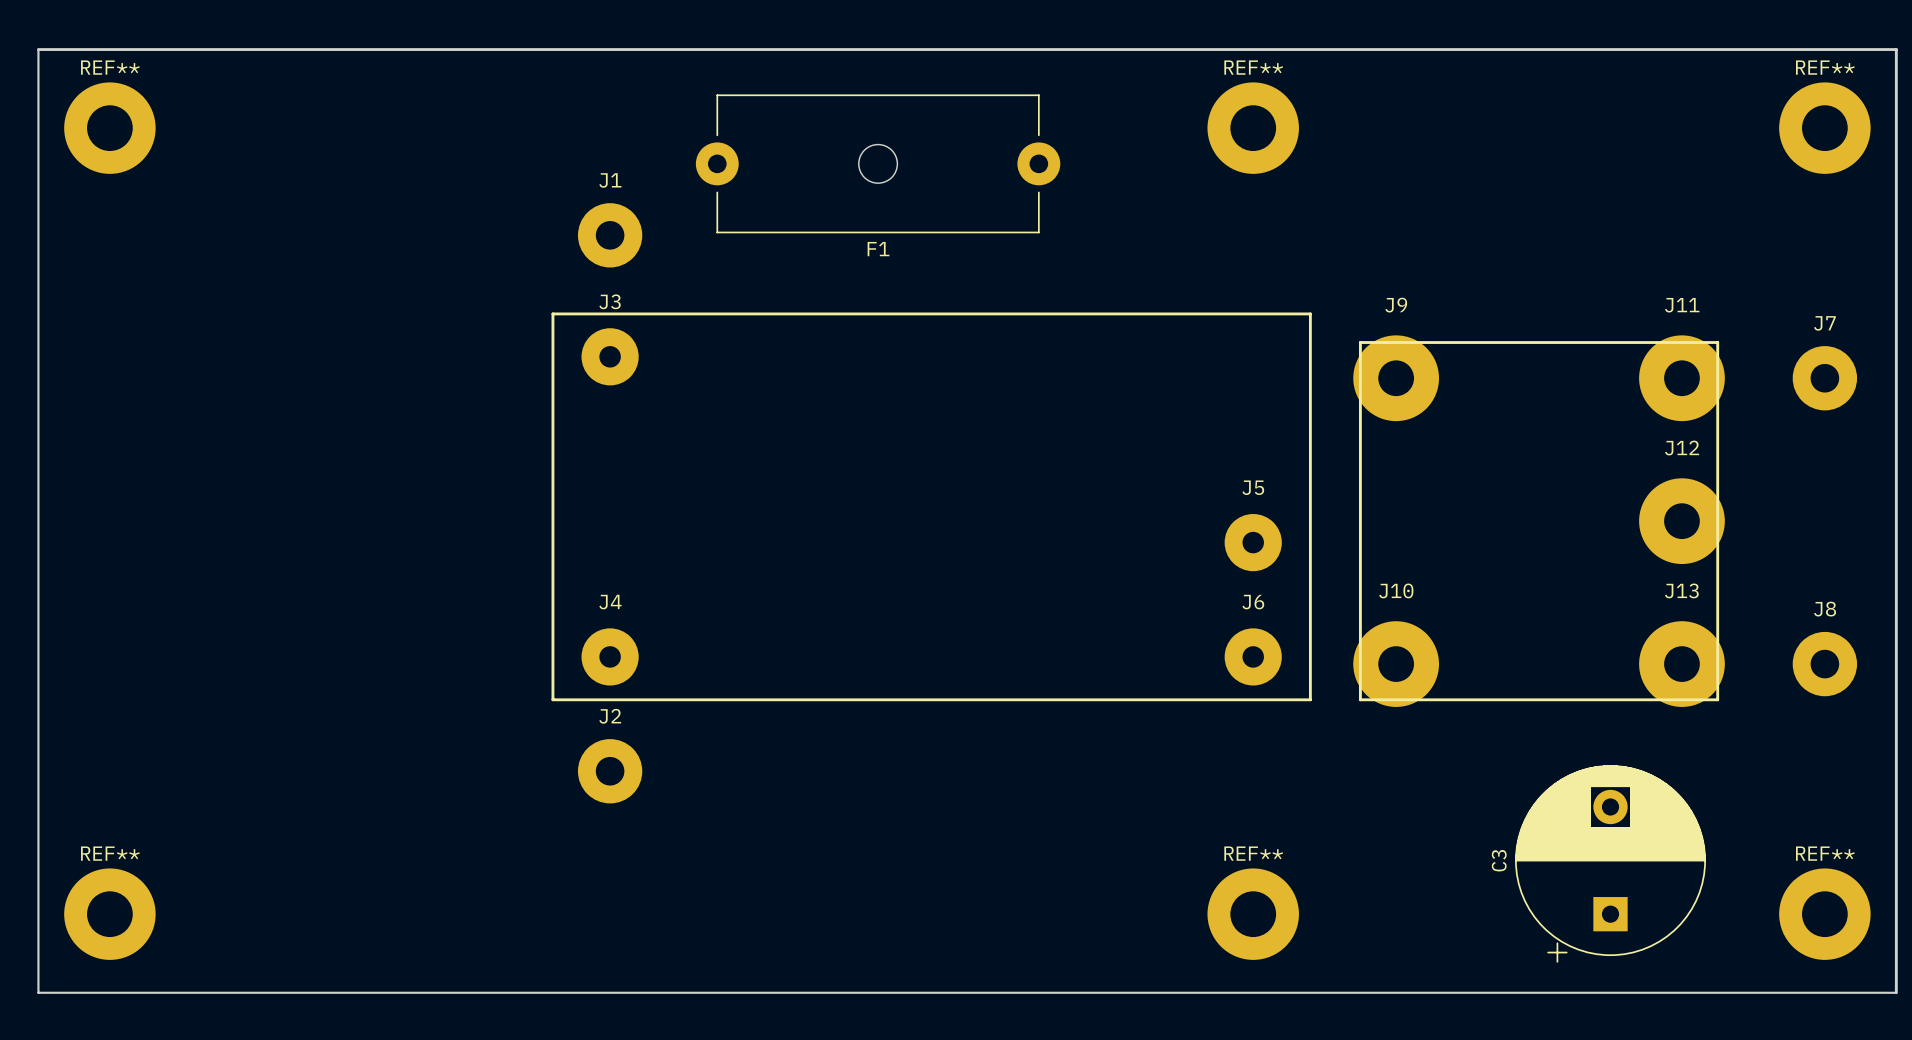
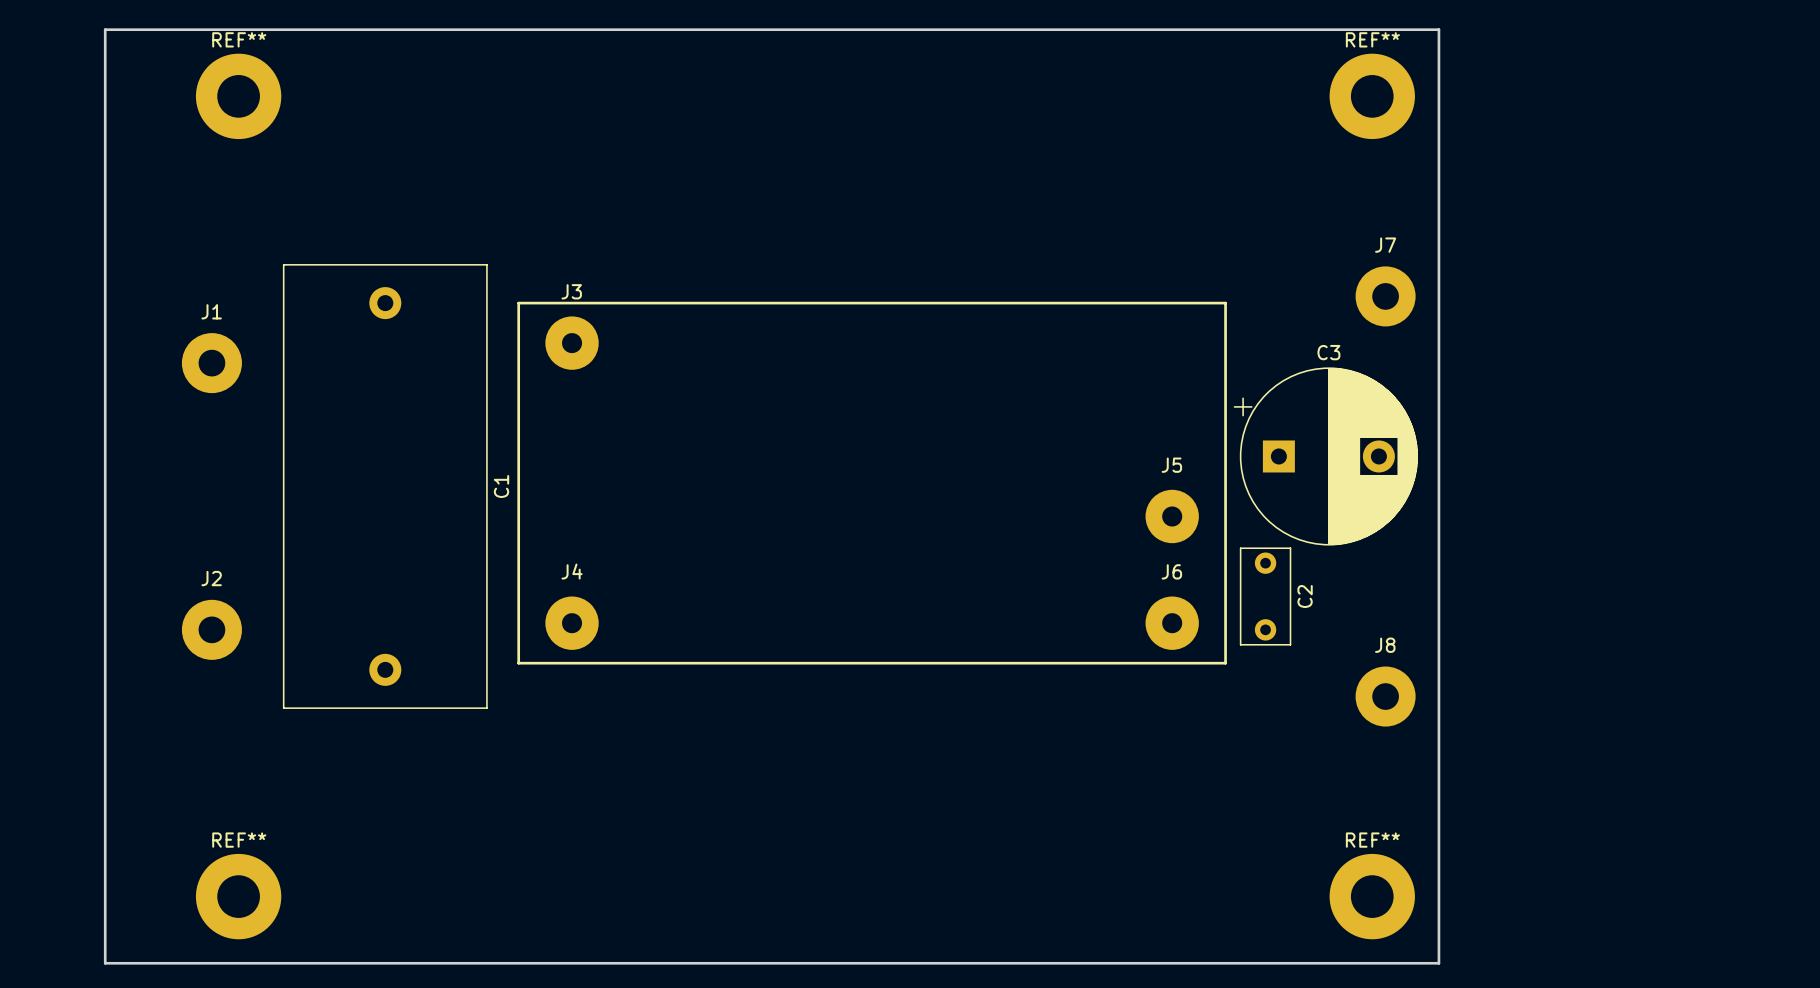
board edge: (38, 49) (38, 992) (1896, 992) (1896, 49) (38, 49) -> (105, 29) (105, 963) (1438, 963) (1438, 29) (105, 29)
REF**: none -> (1372, 96)
REF** position: (109, 128) -> (238, 96)
REF**: (1253, 128) -> none
REF**: (1824, 128) -> none
F1: (878, 163) -> none
J1 position: (610, 235) -> (211, 363)
line: (1360, 342) (1717, 342) (1717, 699) (1360, 699) (1360, 342) -> none
J9: (1396, 378) -> none
J11: (1681, 378) -> none
J7 position: (1824, 378) -> (1385, 296)
C1: none -> (385, 486)
J12: (1681, 521) -> none
C2: none -> (1265, 596)
J10: (1396, 664) -> none
J13: (1681, 664) -> none
J8 position: (1824, 664) -> (1385, 696)
J2 position: (610, 771) -> (211, 629)
C3 rotation: 0° (1610, 863) -> 90° clockwise (1325, 456)
C3 position: (1610, 863) -> (1325, 456)
REF** position: (109, 914) -> (238, 896)
REF**: (1253, 914) -> none
REF**: (1824, 914) -> none
REF**: none -> (1372, 896)

